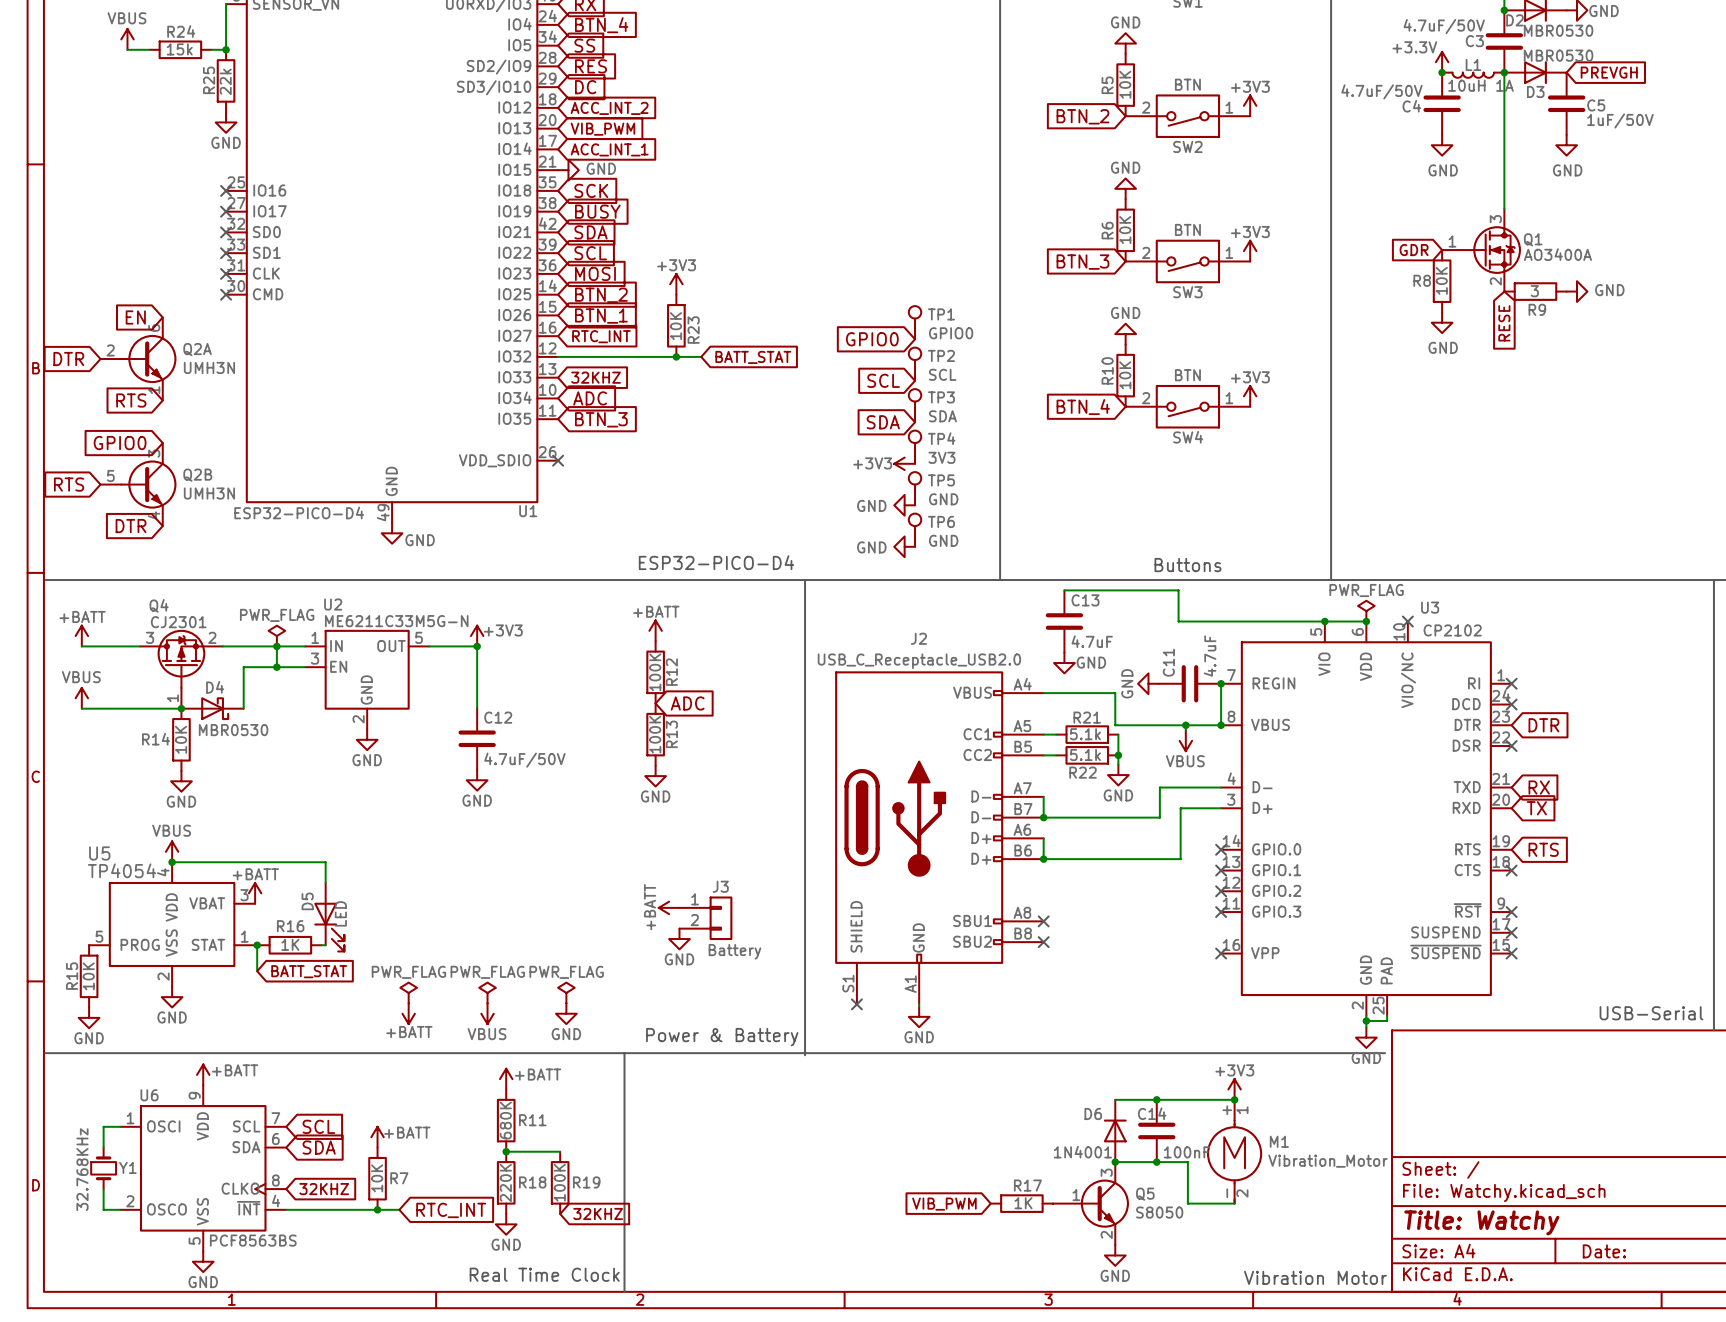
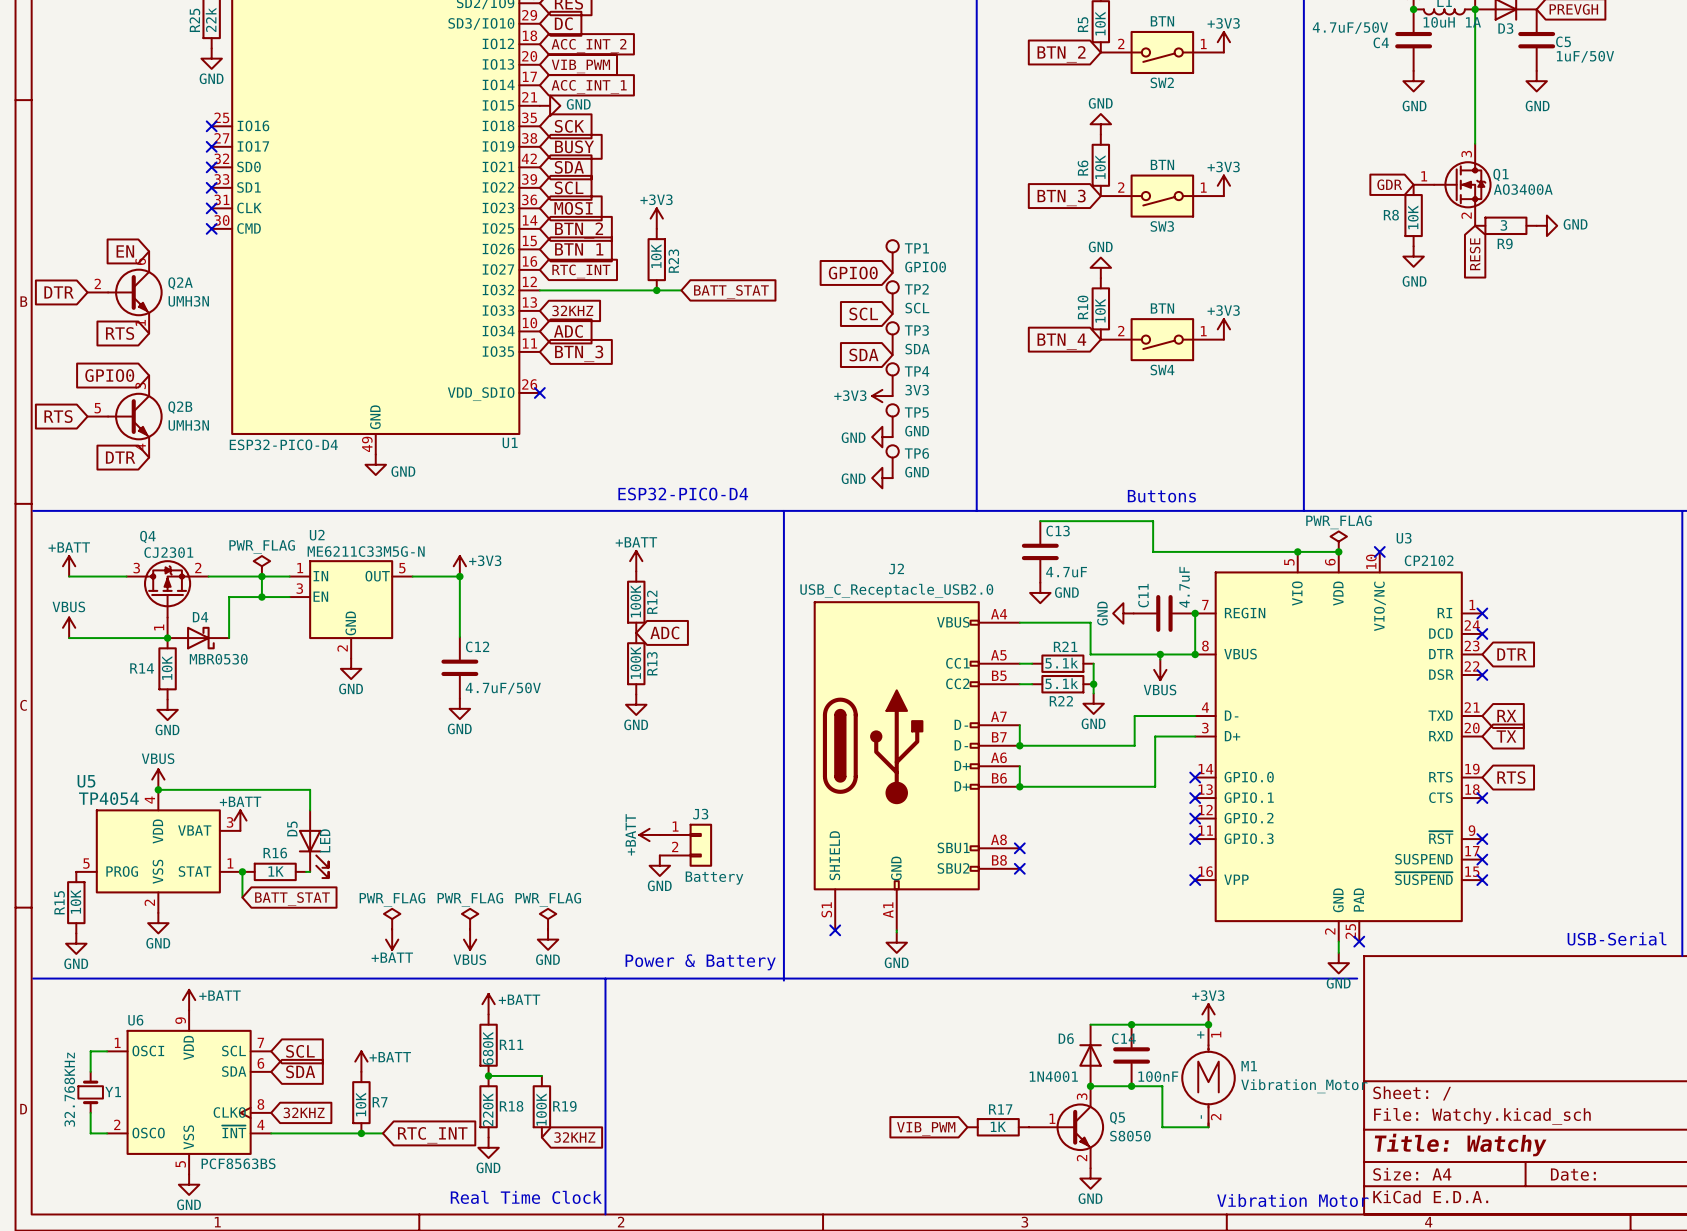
wire: (1387, 1015) (1387, 1020) (1366, 1020) -> none
no-connect mark: none -> (1359, 941)
junction: (1366, 1020) -> none

